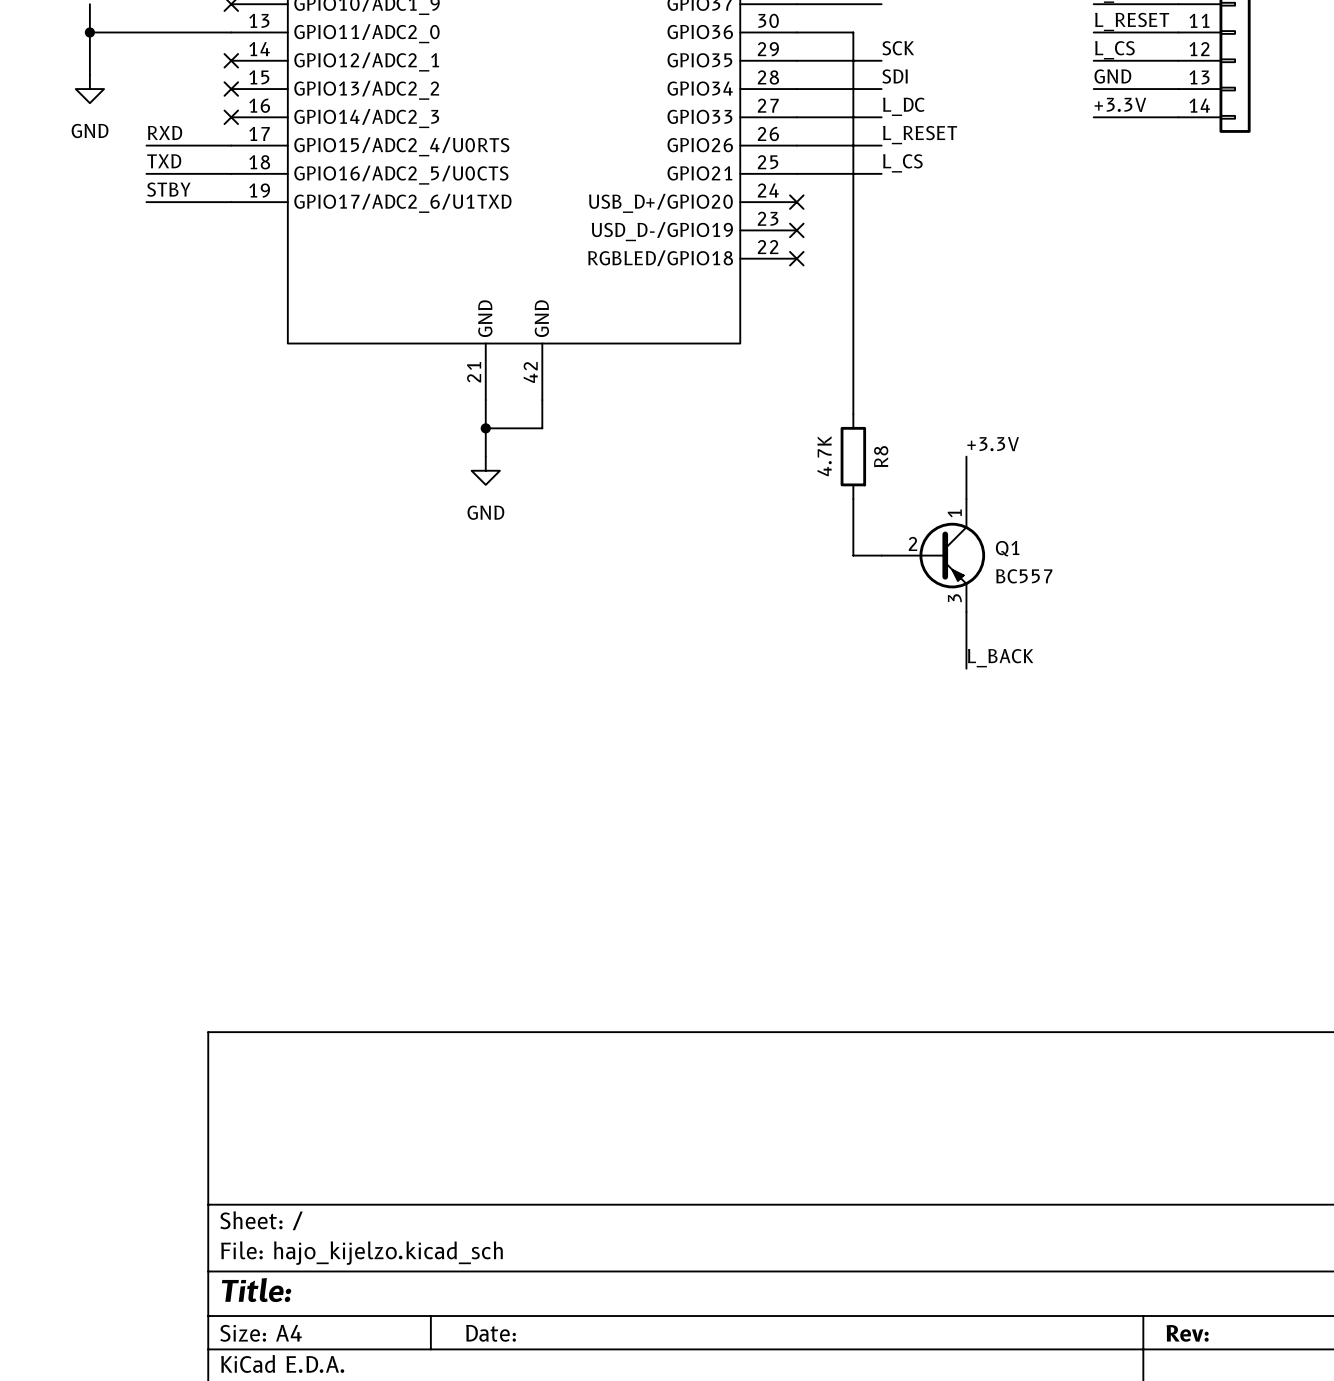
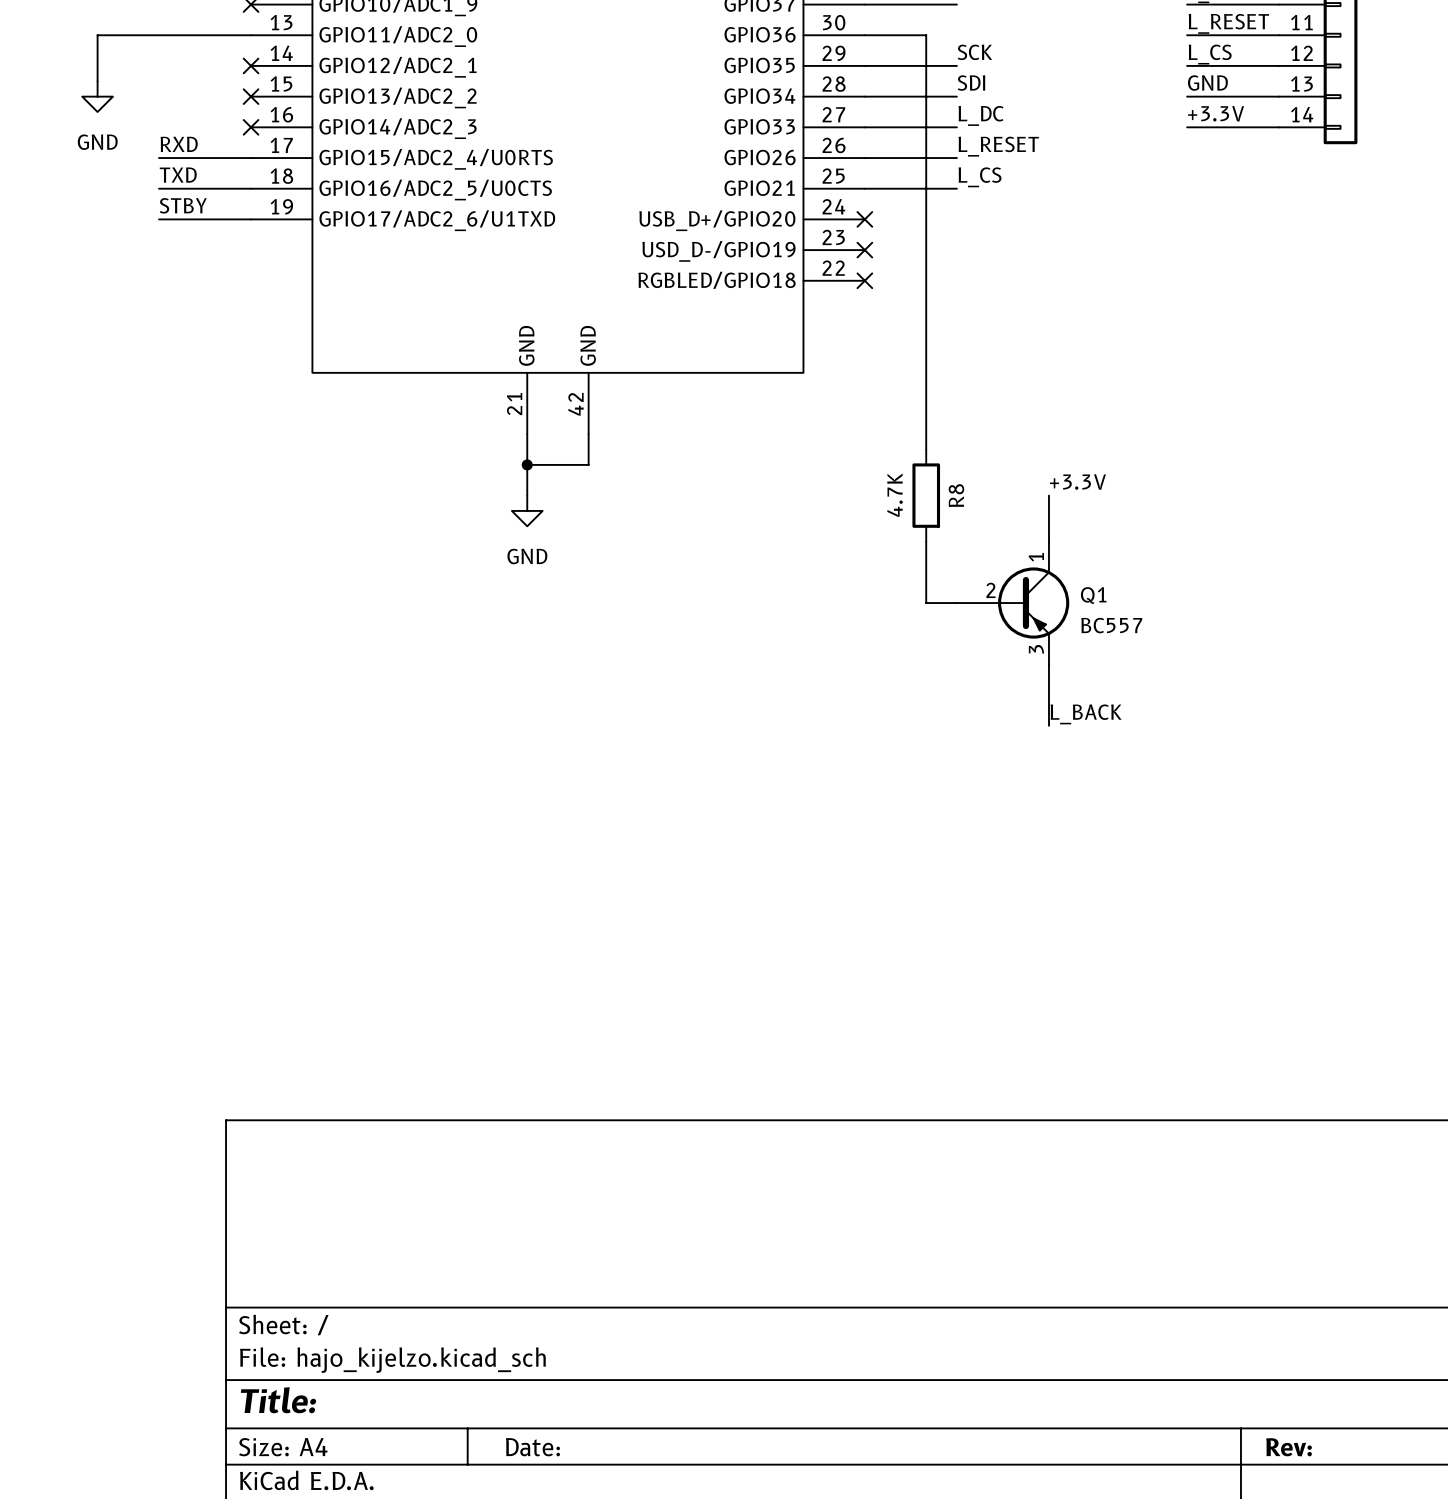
wire: (89, 4) (89, 32) -> none
junction: (89, 32) -> none

